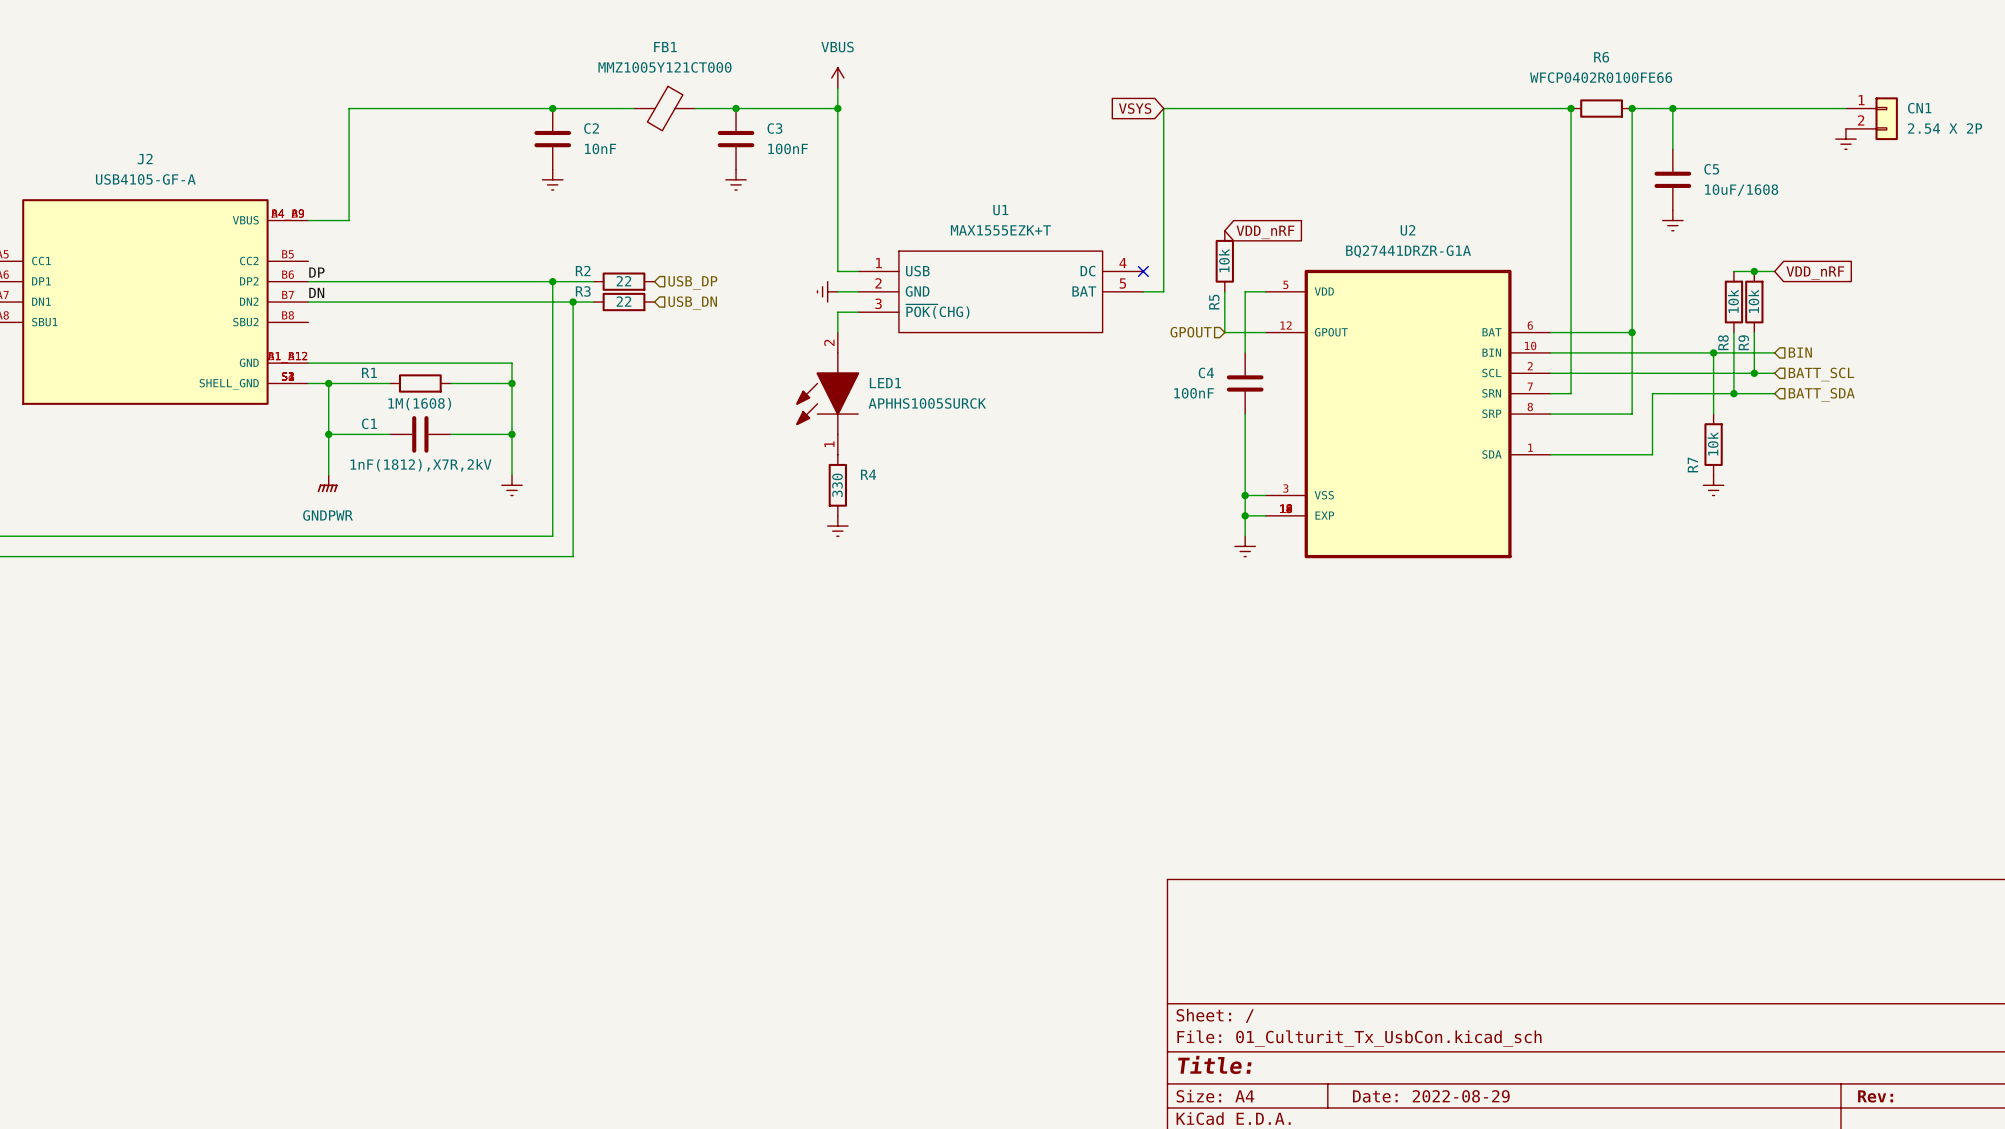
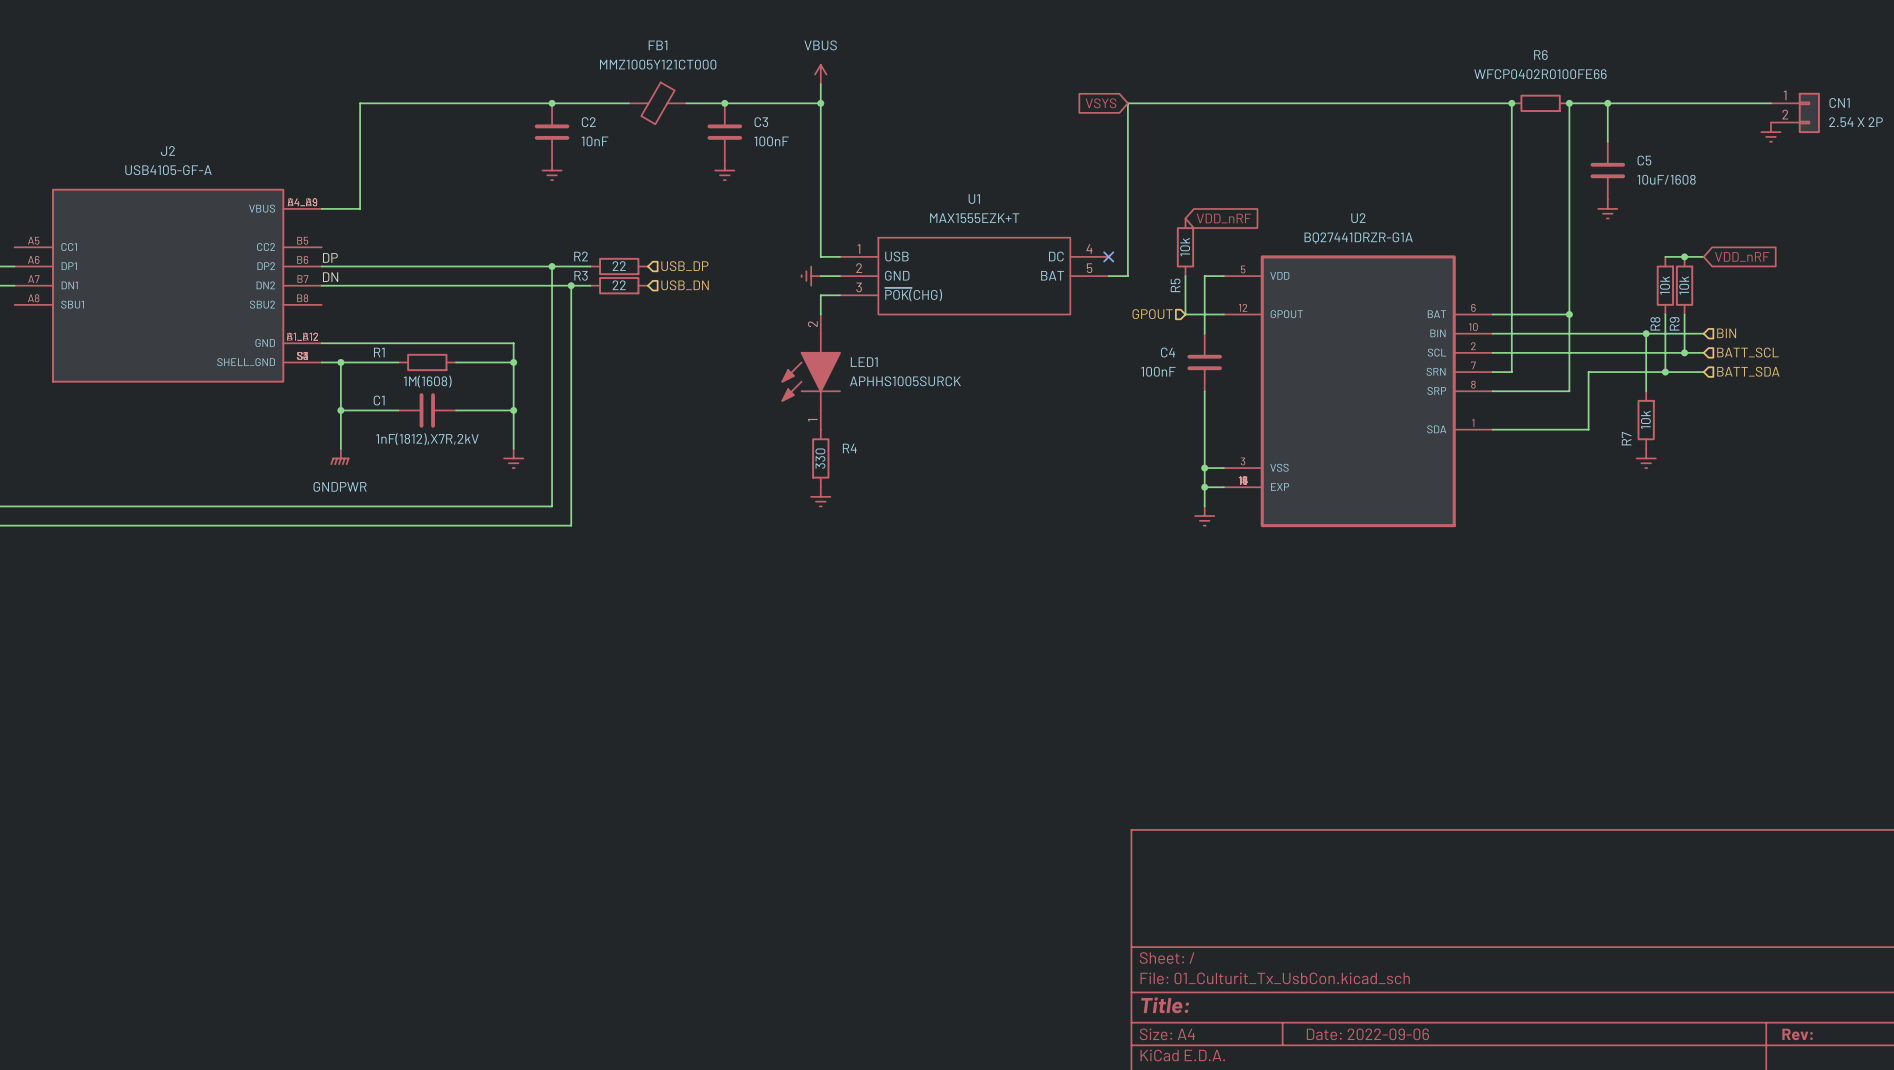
title block: Date: 2022-08-29 (1431, 1096) -> Date: 2022-09-06 (1367, 1034)

